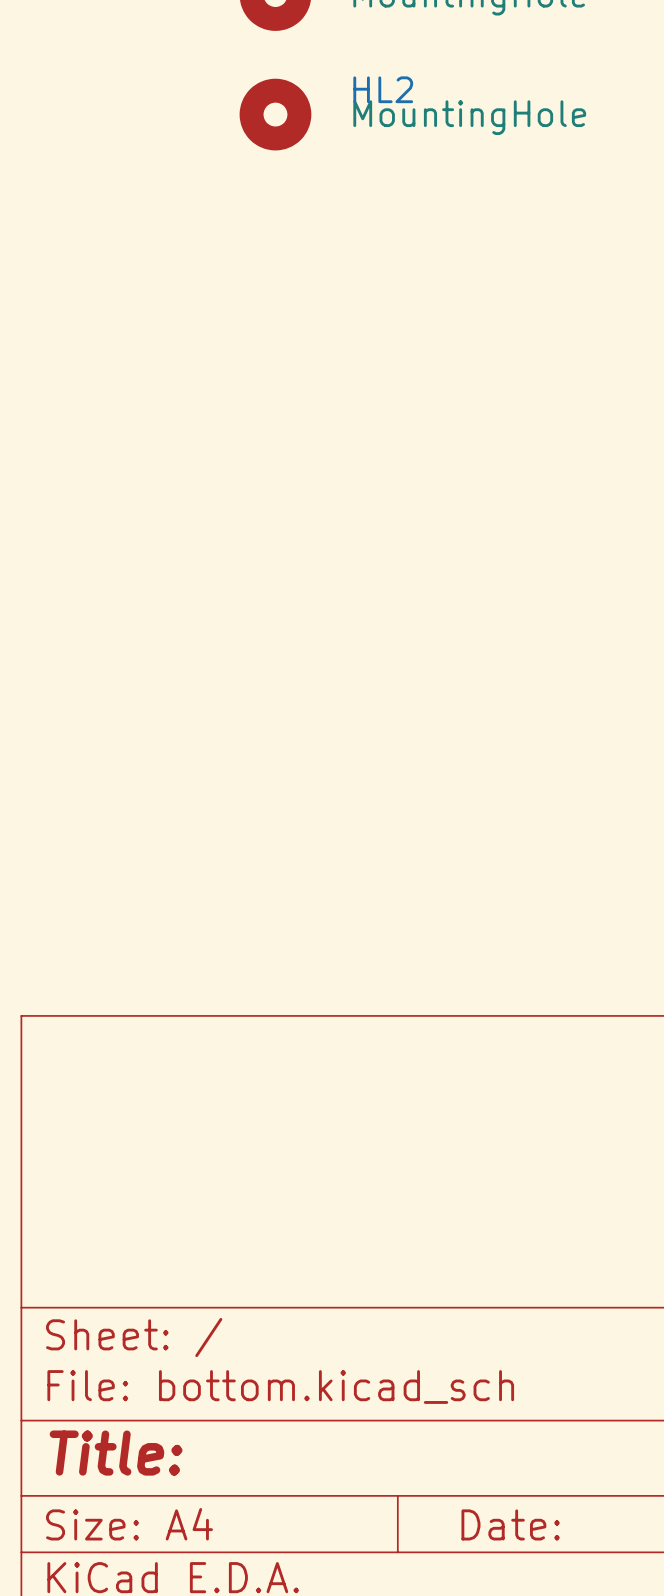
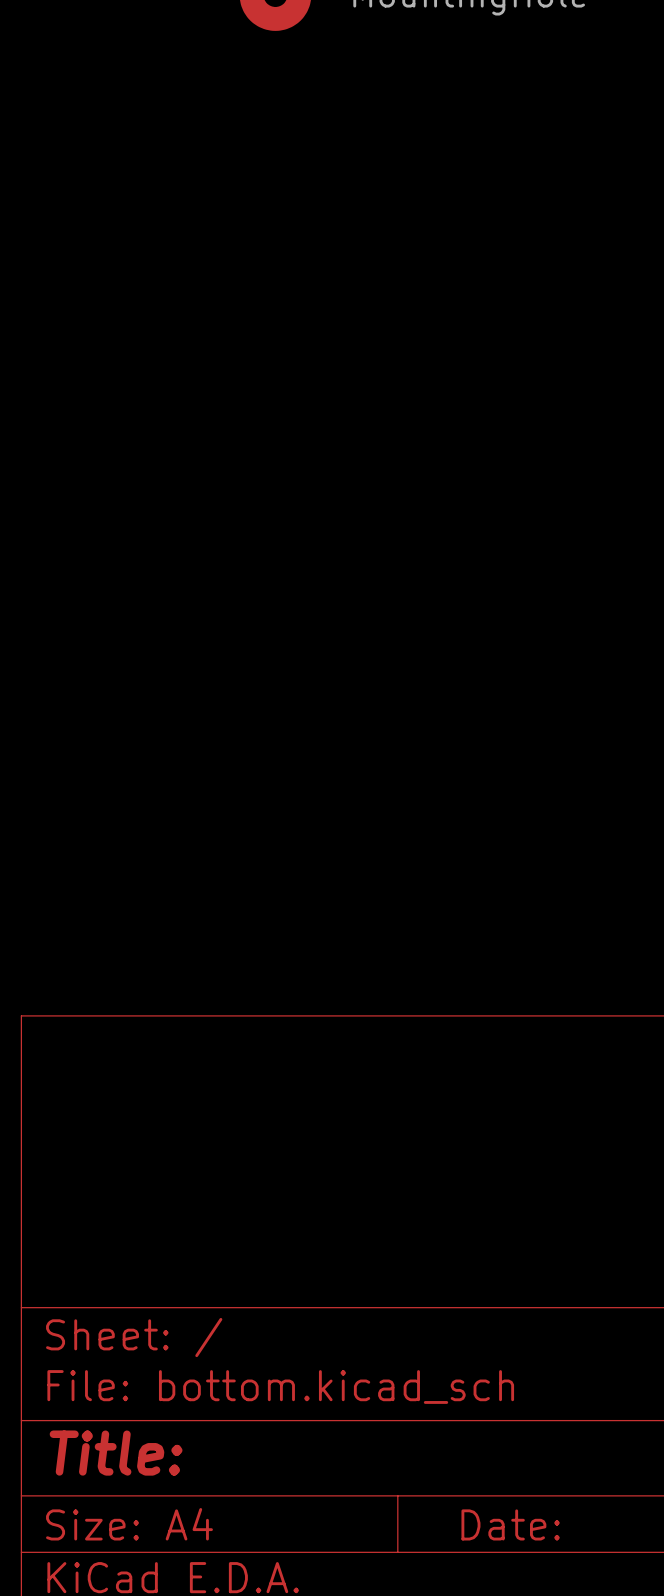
HL2: MountingHole (275, 114) -> none

